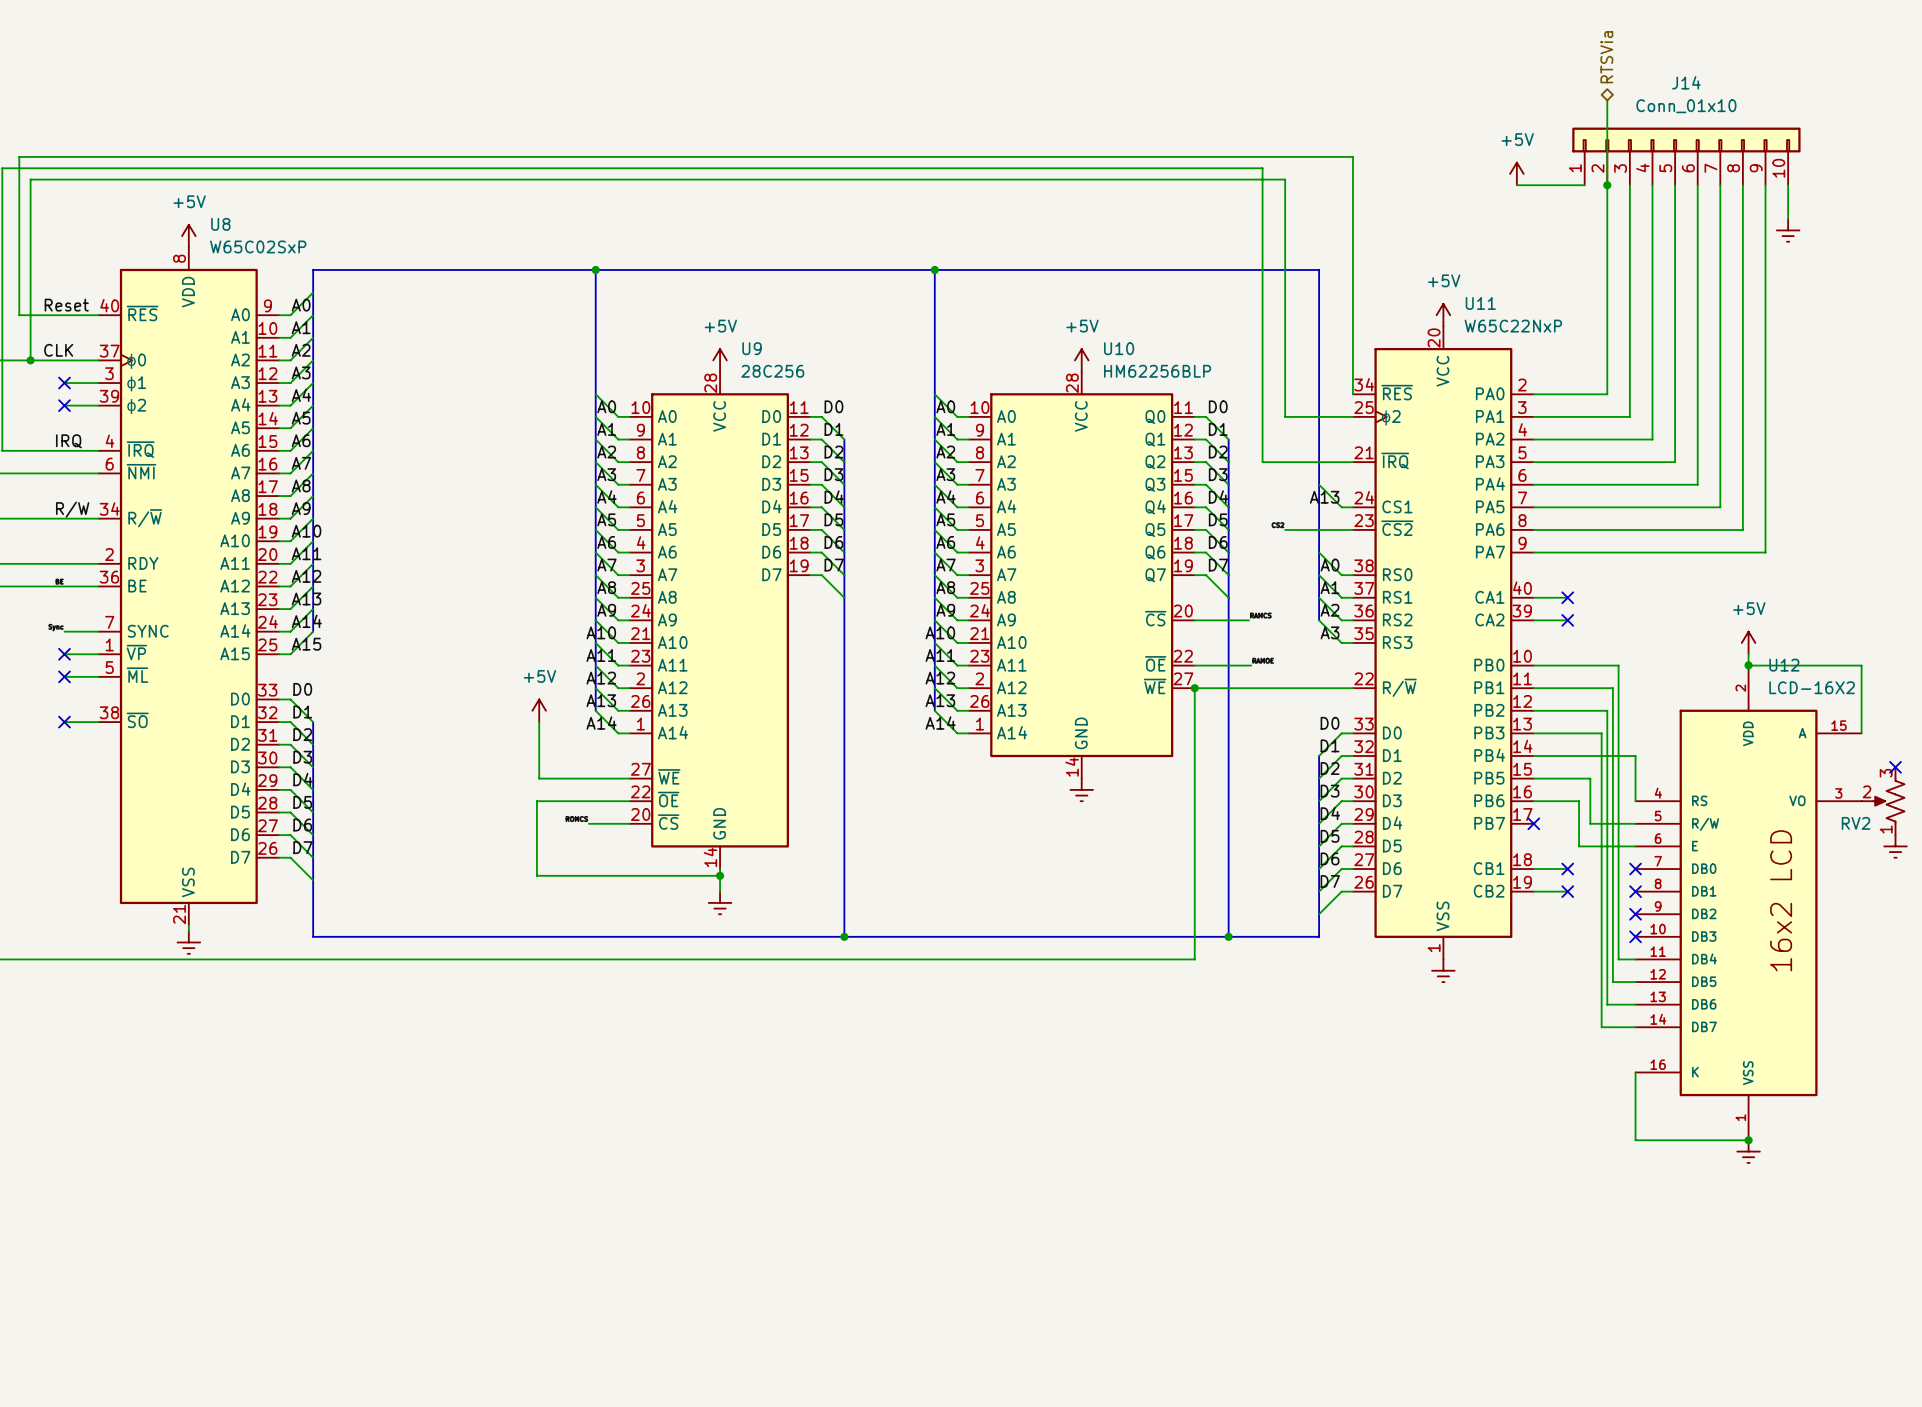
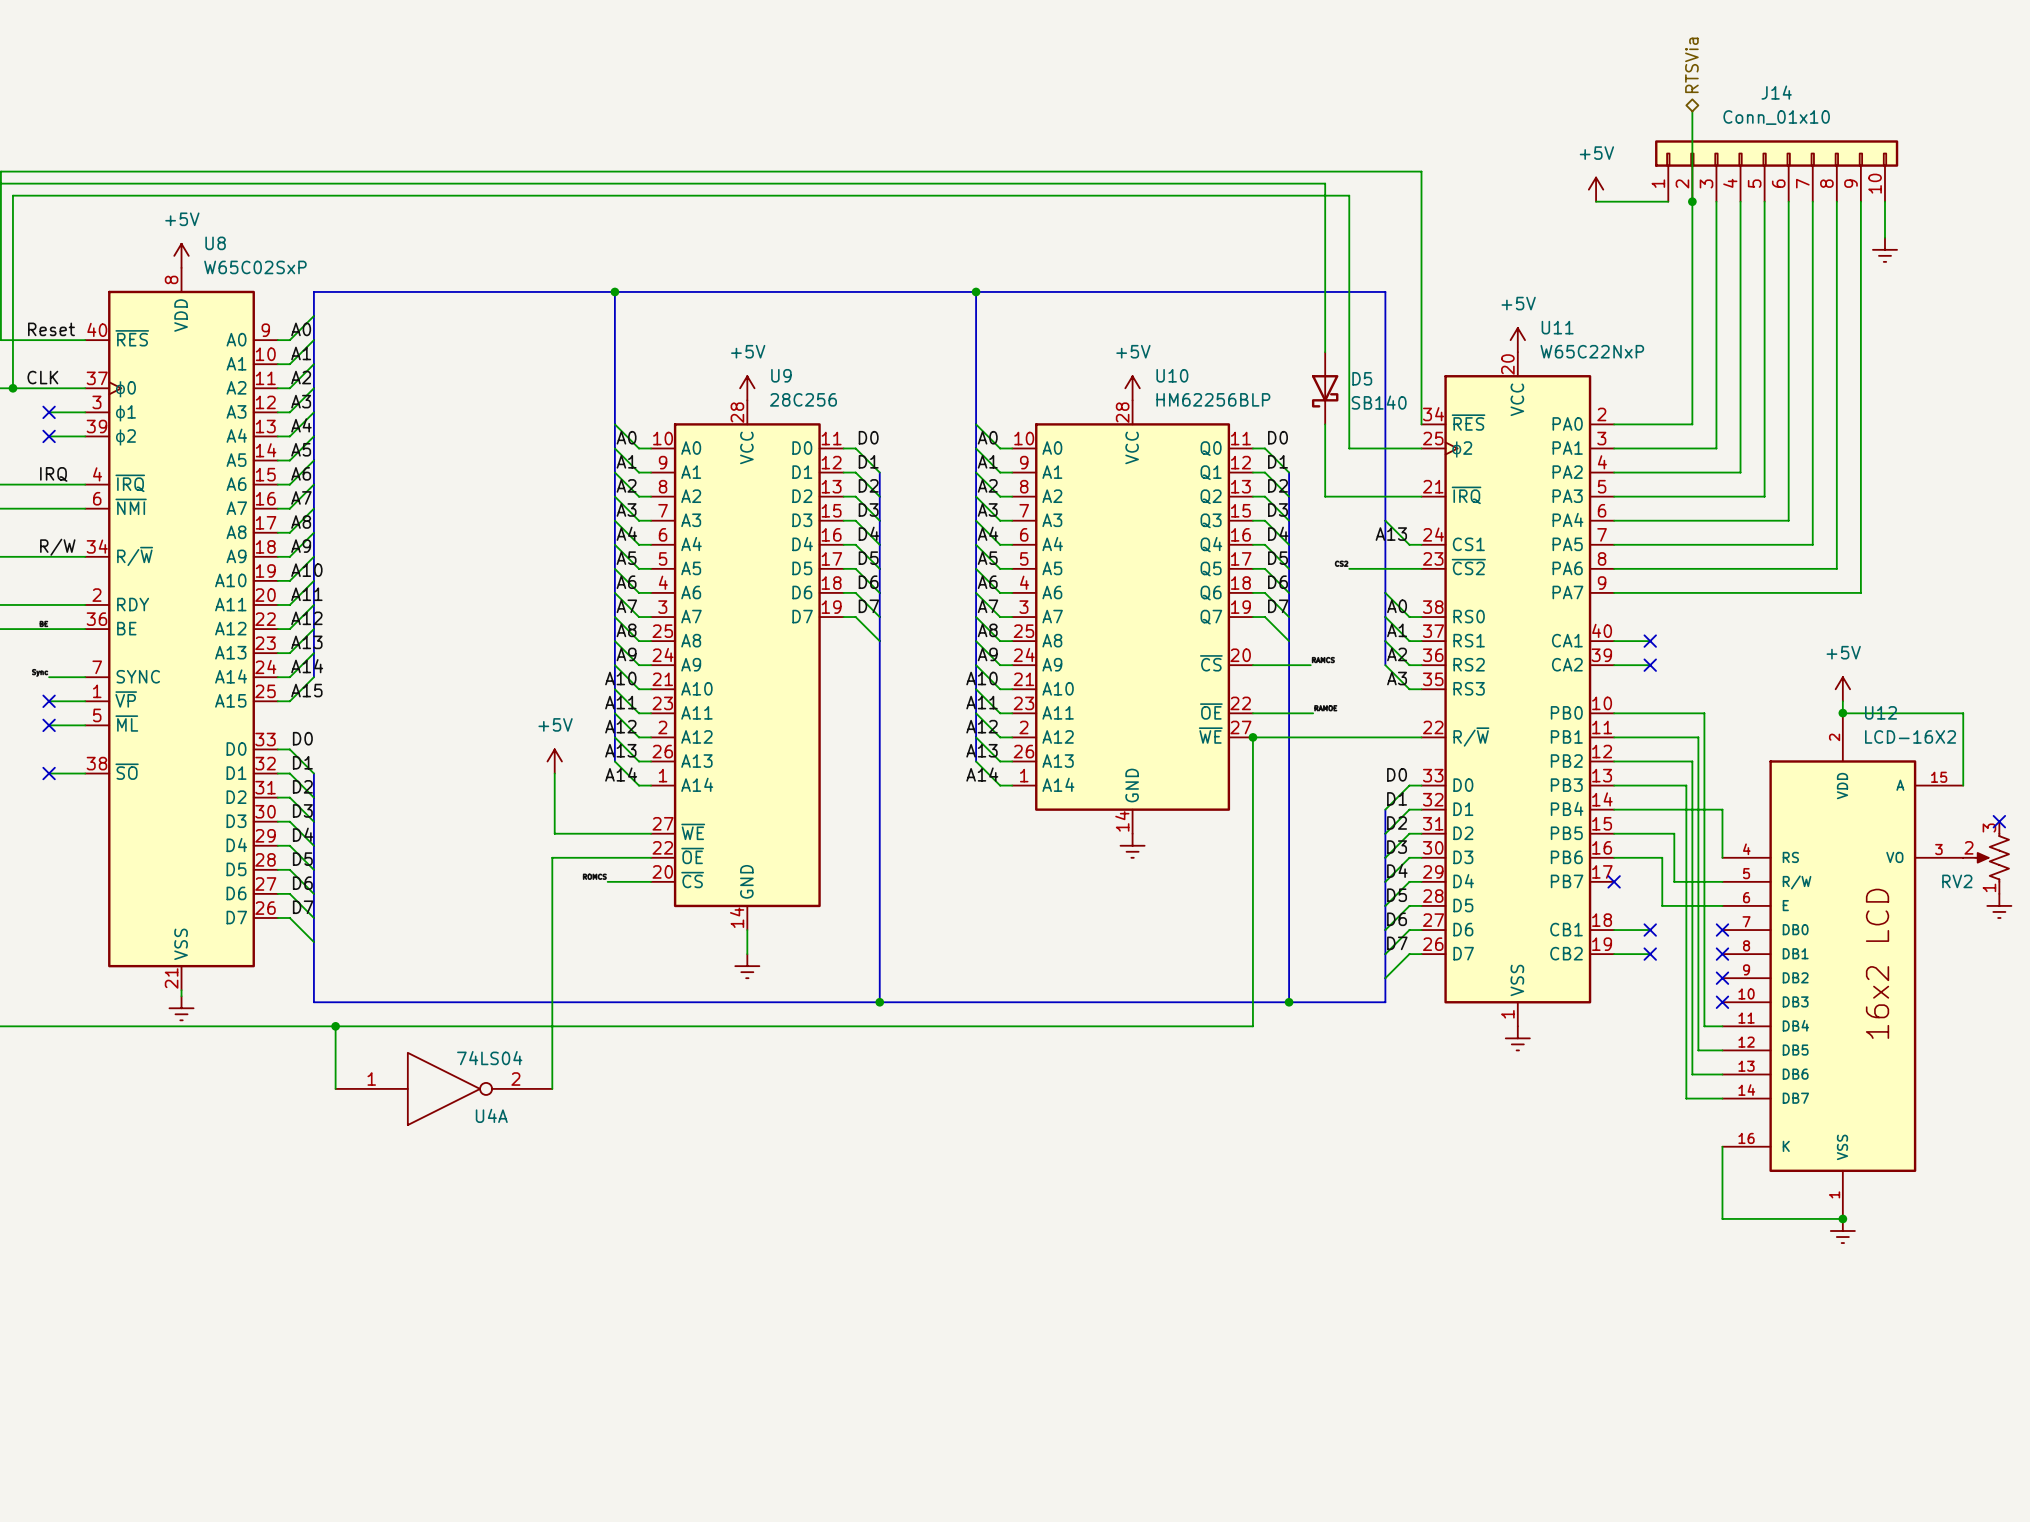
D5: none -> SB140 (1325, 388)
wire: (536, 875) (720, 875) -> (552, 937) (552, 1088)
junction: (720, 875) -> none
wire: none -> (335, 1026) (335, 1088)
junction: none -> (335, 1026)
U4A: none -> 74LS04 (443, 1088)

